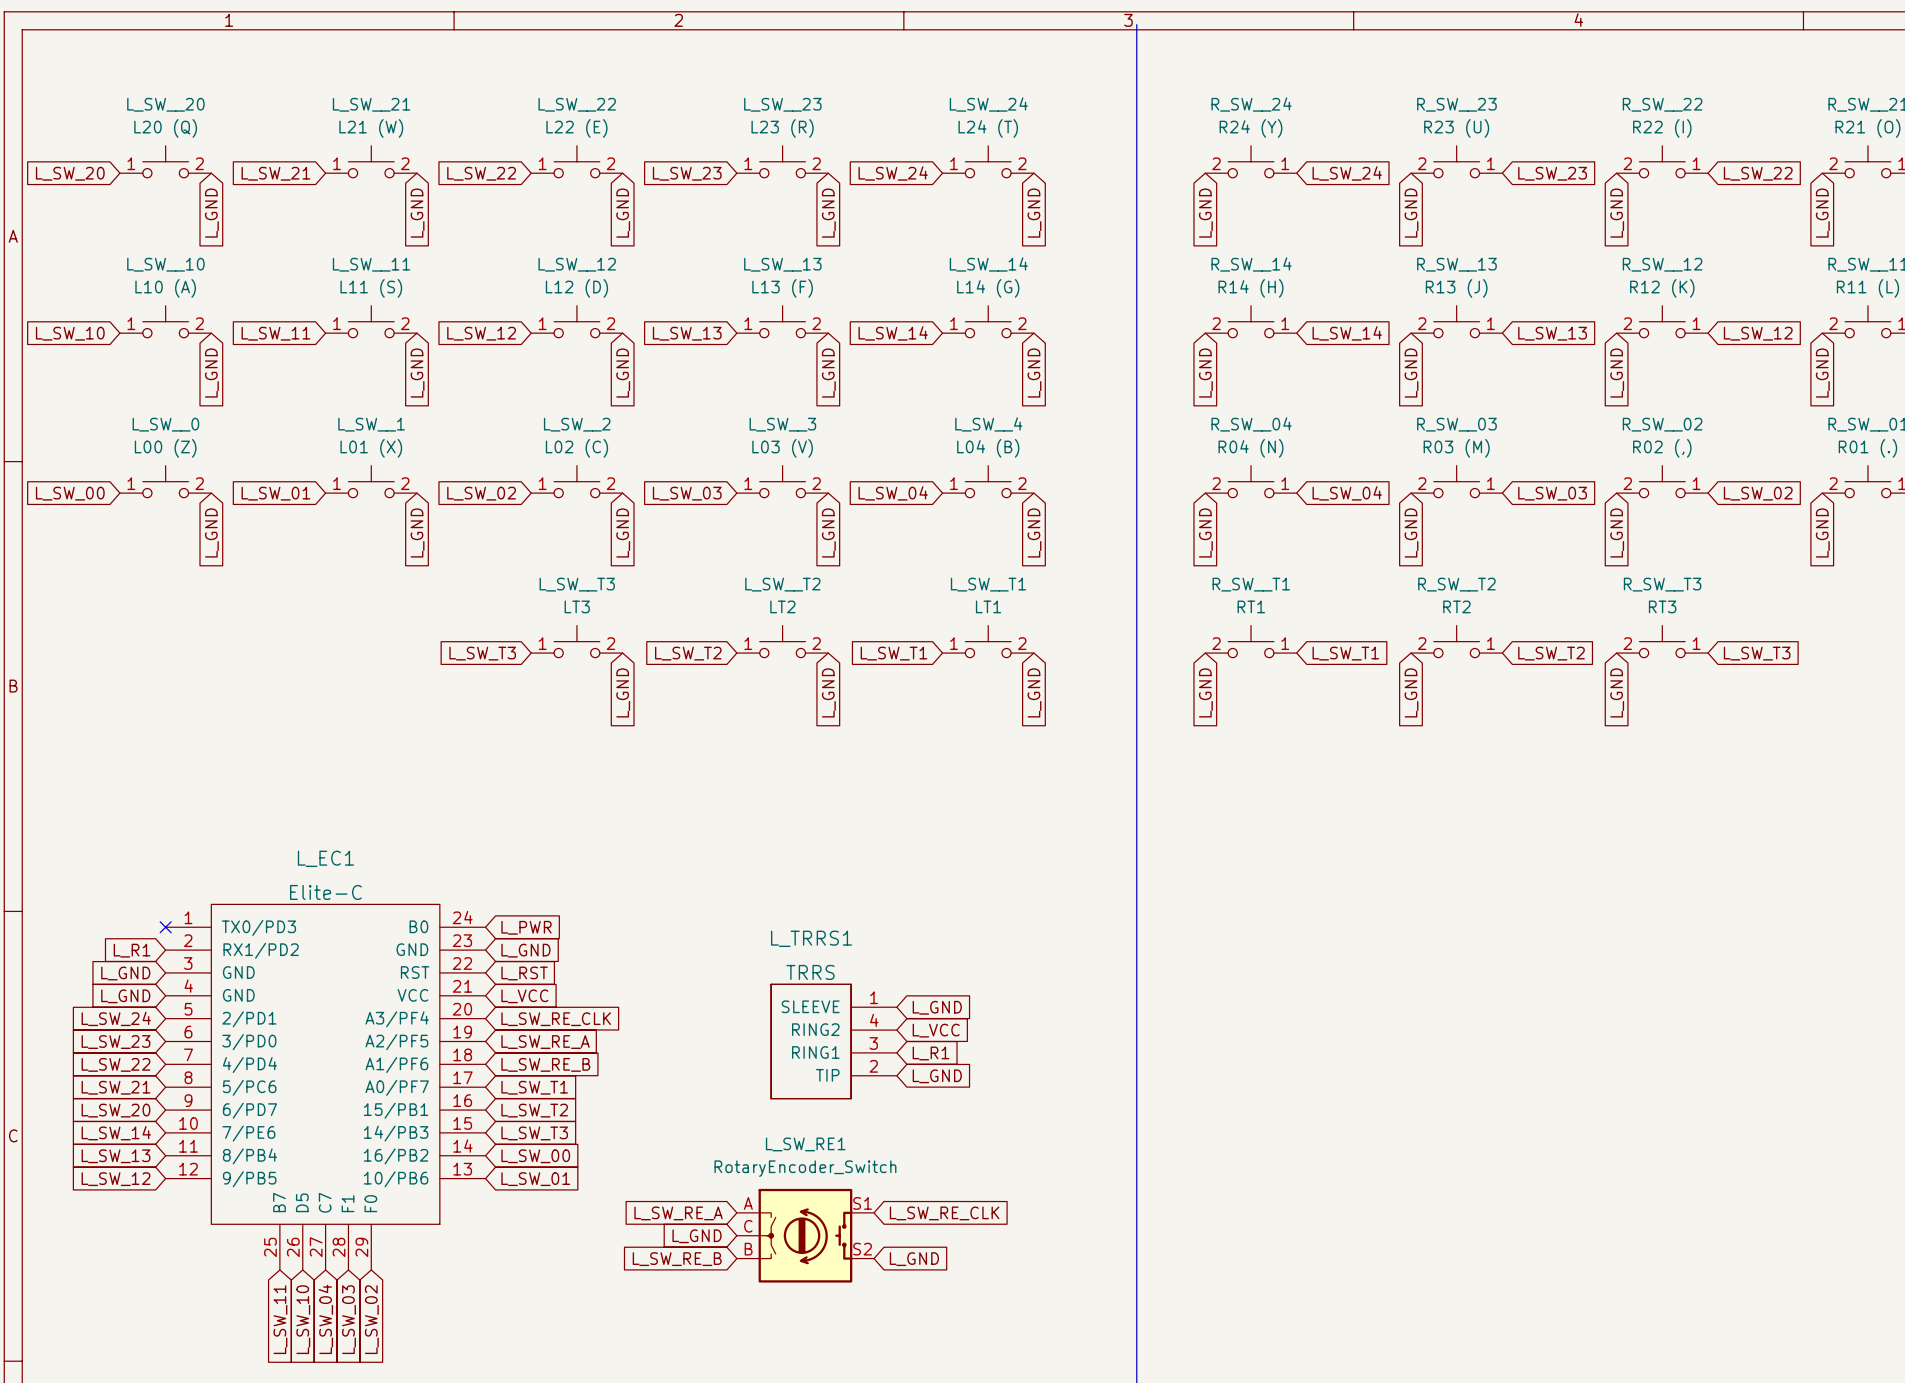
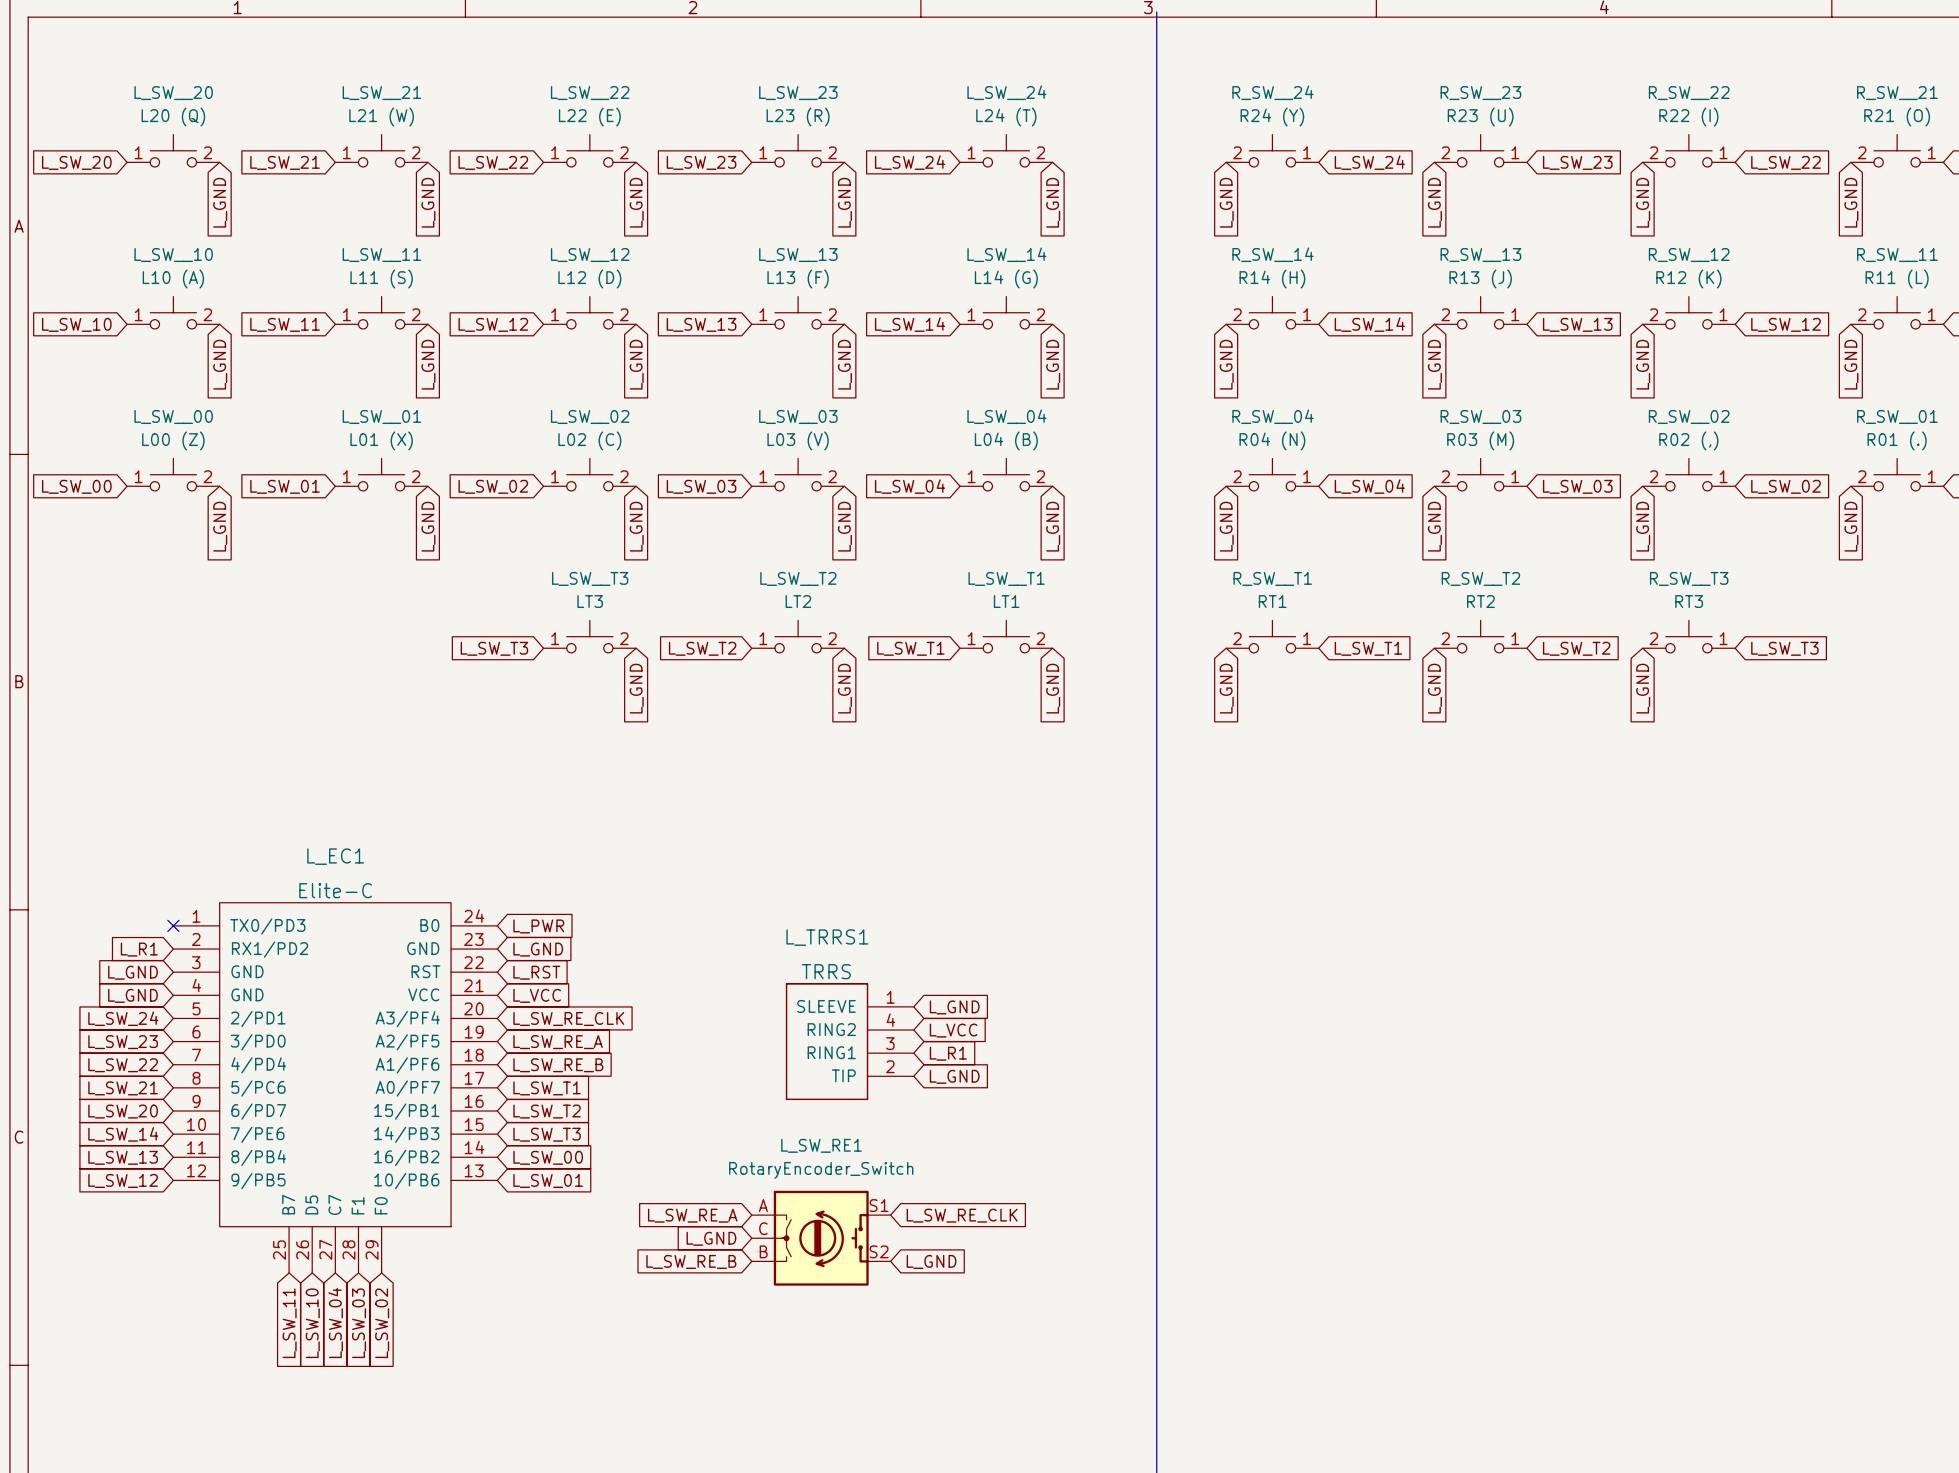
L_SW__0 name: L_SW__0 (165, 424) -> L_SW__00 (173, 416)
L_SW__1 name: L_SW__1 (371, 424) -> L_SW__01 (381, 416)
L_SW__2 name: L_SW__2 (577, 424) -> L_SW__02 (590, 416)
L_SW__3 name: L_SW__3 (782, 424) -> L_SW__03 (798, 416)
L_SW__4 name: L_SW__4 (988, 424) -> L_SW__04 (1006, 416)

